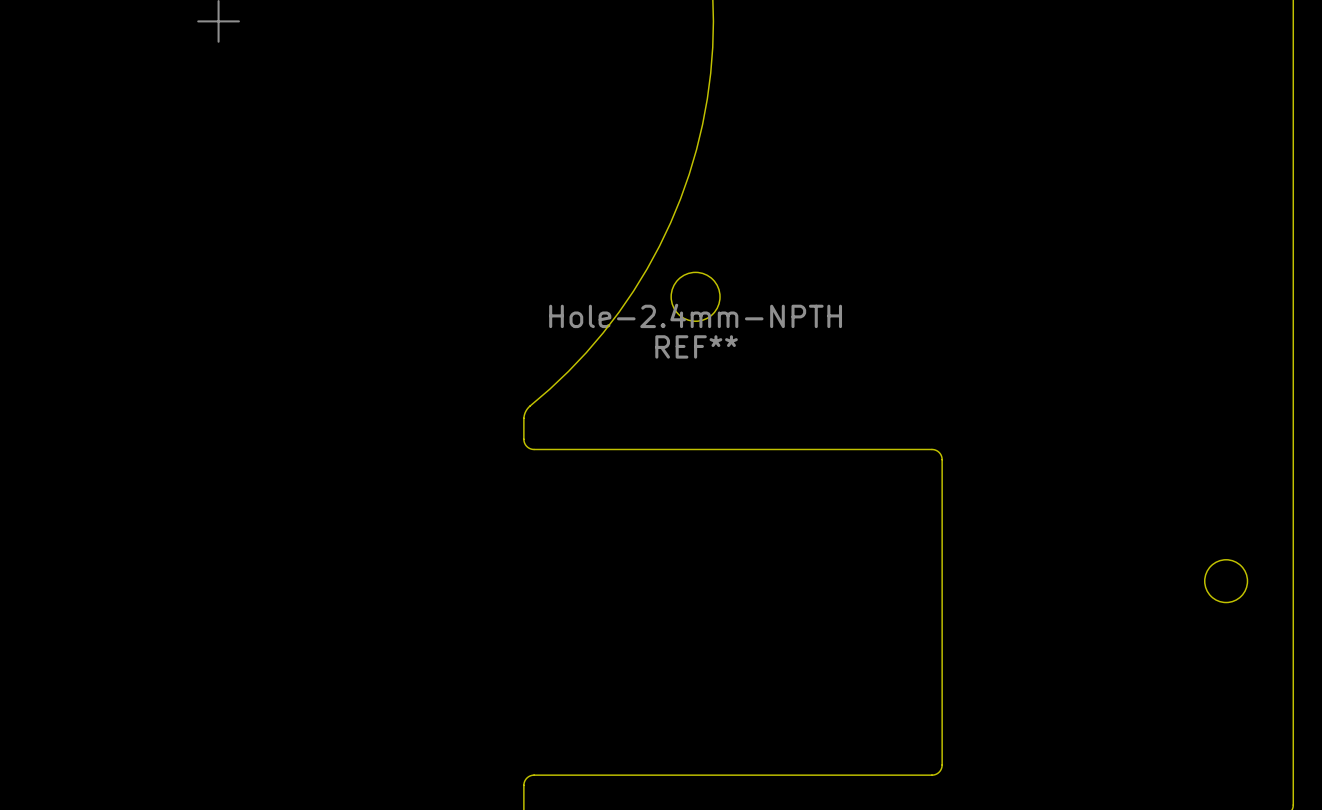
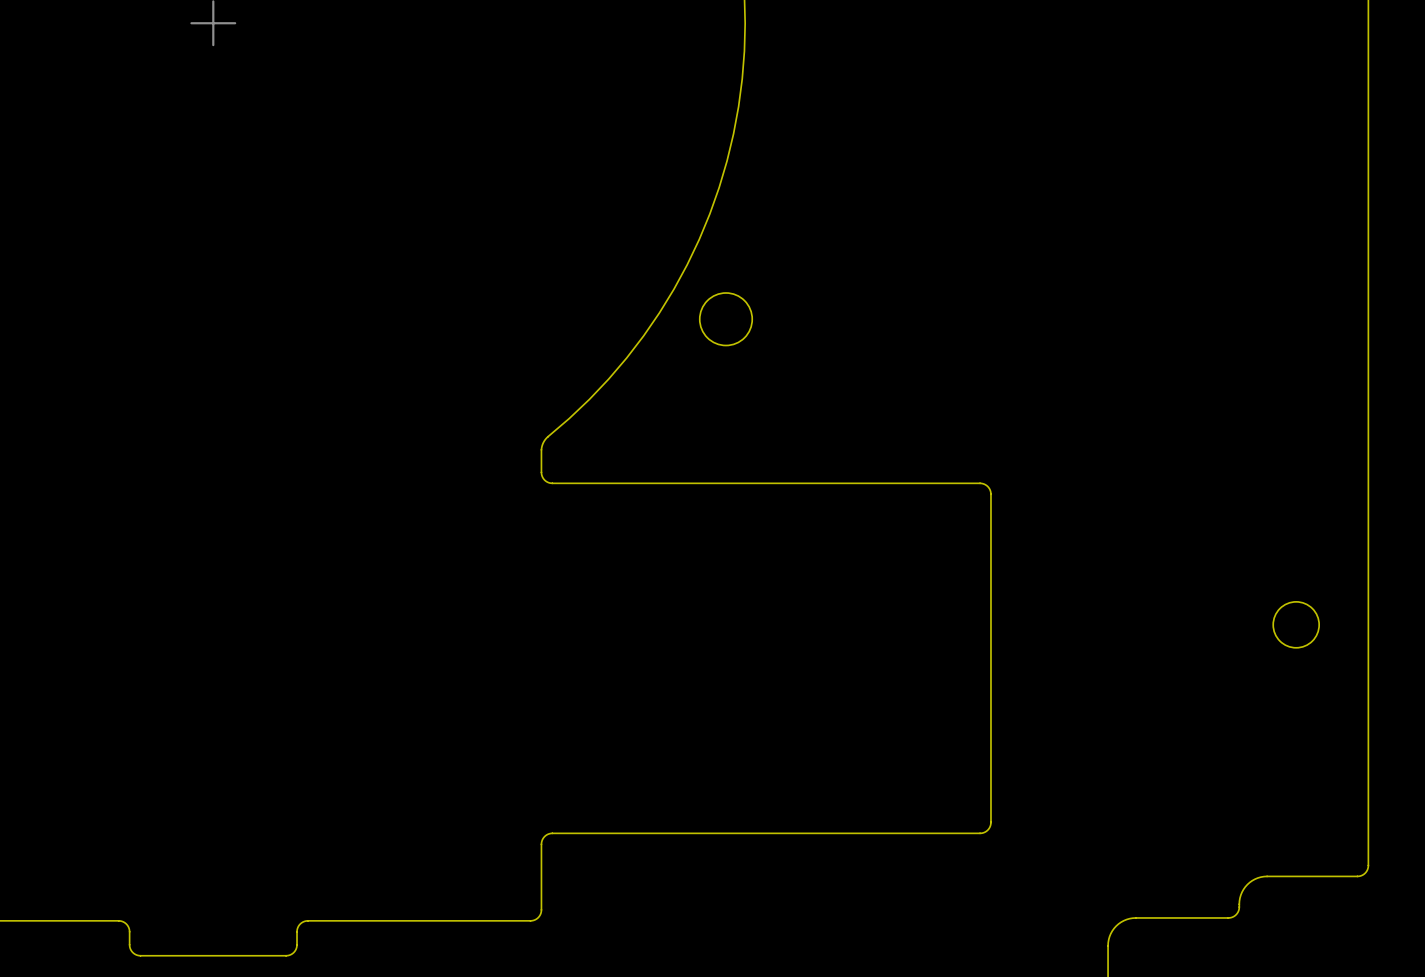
round board edge: none -> [699, 292, 753, 347]
REF**: Hole-2.4mm-NPTH (695, 296) -> none

